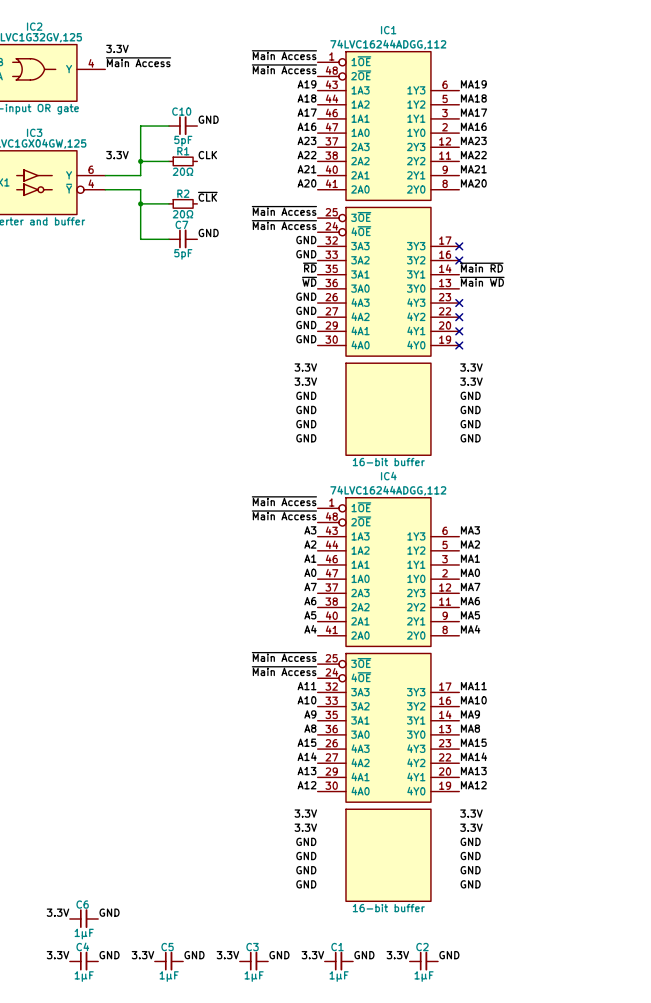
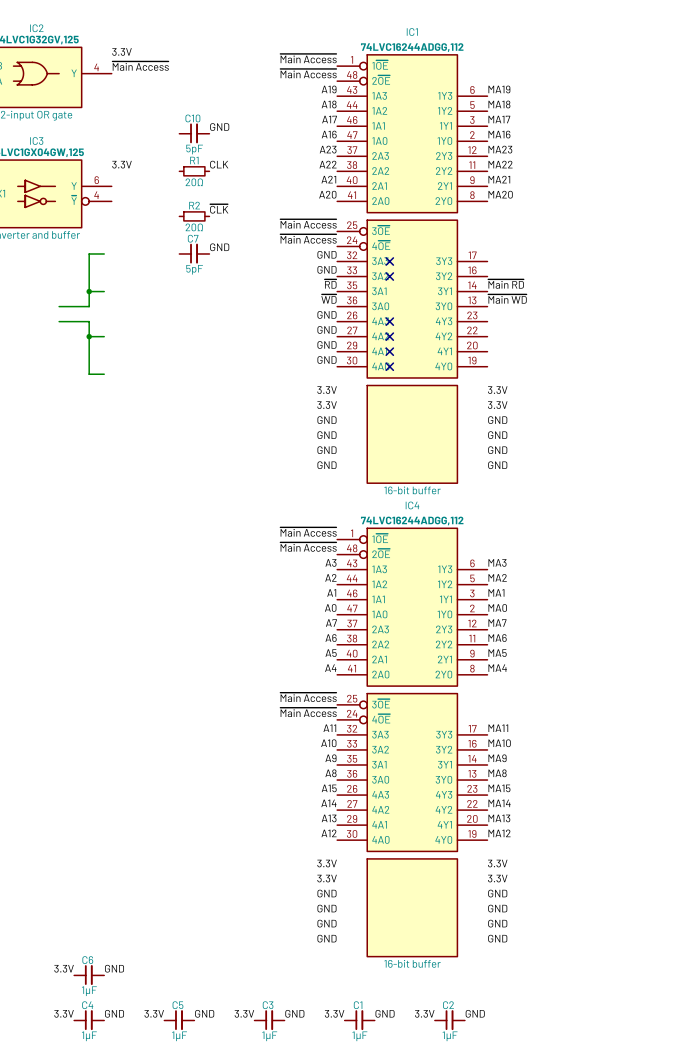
wire: (168, 126) (140, 126) (140, 175) (105, 175) -> none
wire: (140, 161) (168, 161) -> none
junction: (140, 161) -> none
wire: (105, 189) (140, 189) (140, 239) (168, 239) -> none
wire: (140, 203) (168, 203) -> none
junction: (140, 203) -> none
wire: none -> (104, 253) (89, 253) (89, 306) (59, 306)
no-connect mark: none -> (389, 261)
no-connect mark: (459, 246) -> none
no-connect mark: none -> (389, 276)
no-connect mark: (459, 260) -> none
wire: none -> (89, 291) (104, 291)
junction: none -> (89, 291)
wire: none -> (59, 321) (89, 321) (89, 374) (104, 374)
no-connect mark: none -> (389, 321)
no-connect mark: (459, 303) -> none
wire: none -> (89, 336) (104, 336)
junction: none -> (89, 336)
no-connect mark: none -> (389, 336)
no-connect mark: (459, 317) -> none
no-connect mark: none -> (389, 351)
no-connect mark: (459, 331) -> none
no-connect mark: none -> (389, 366)
no-connect mark: (459, 345) -> none

